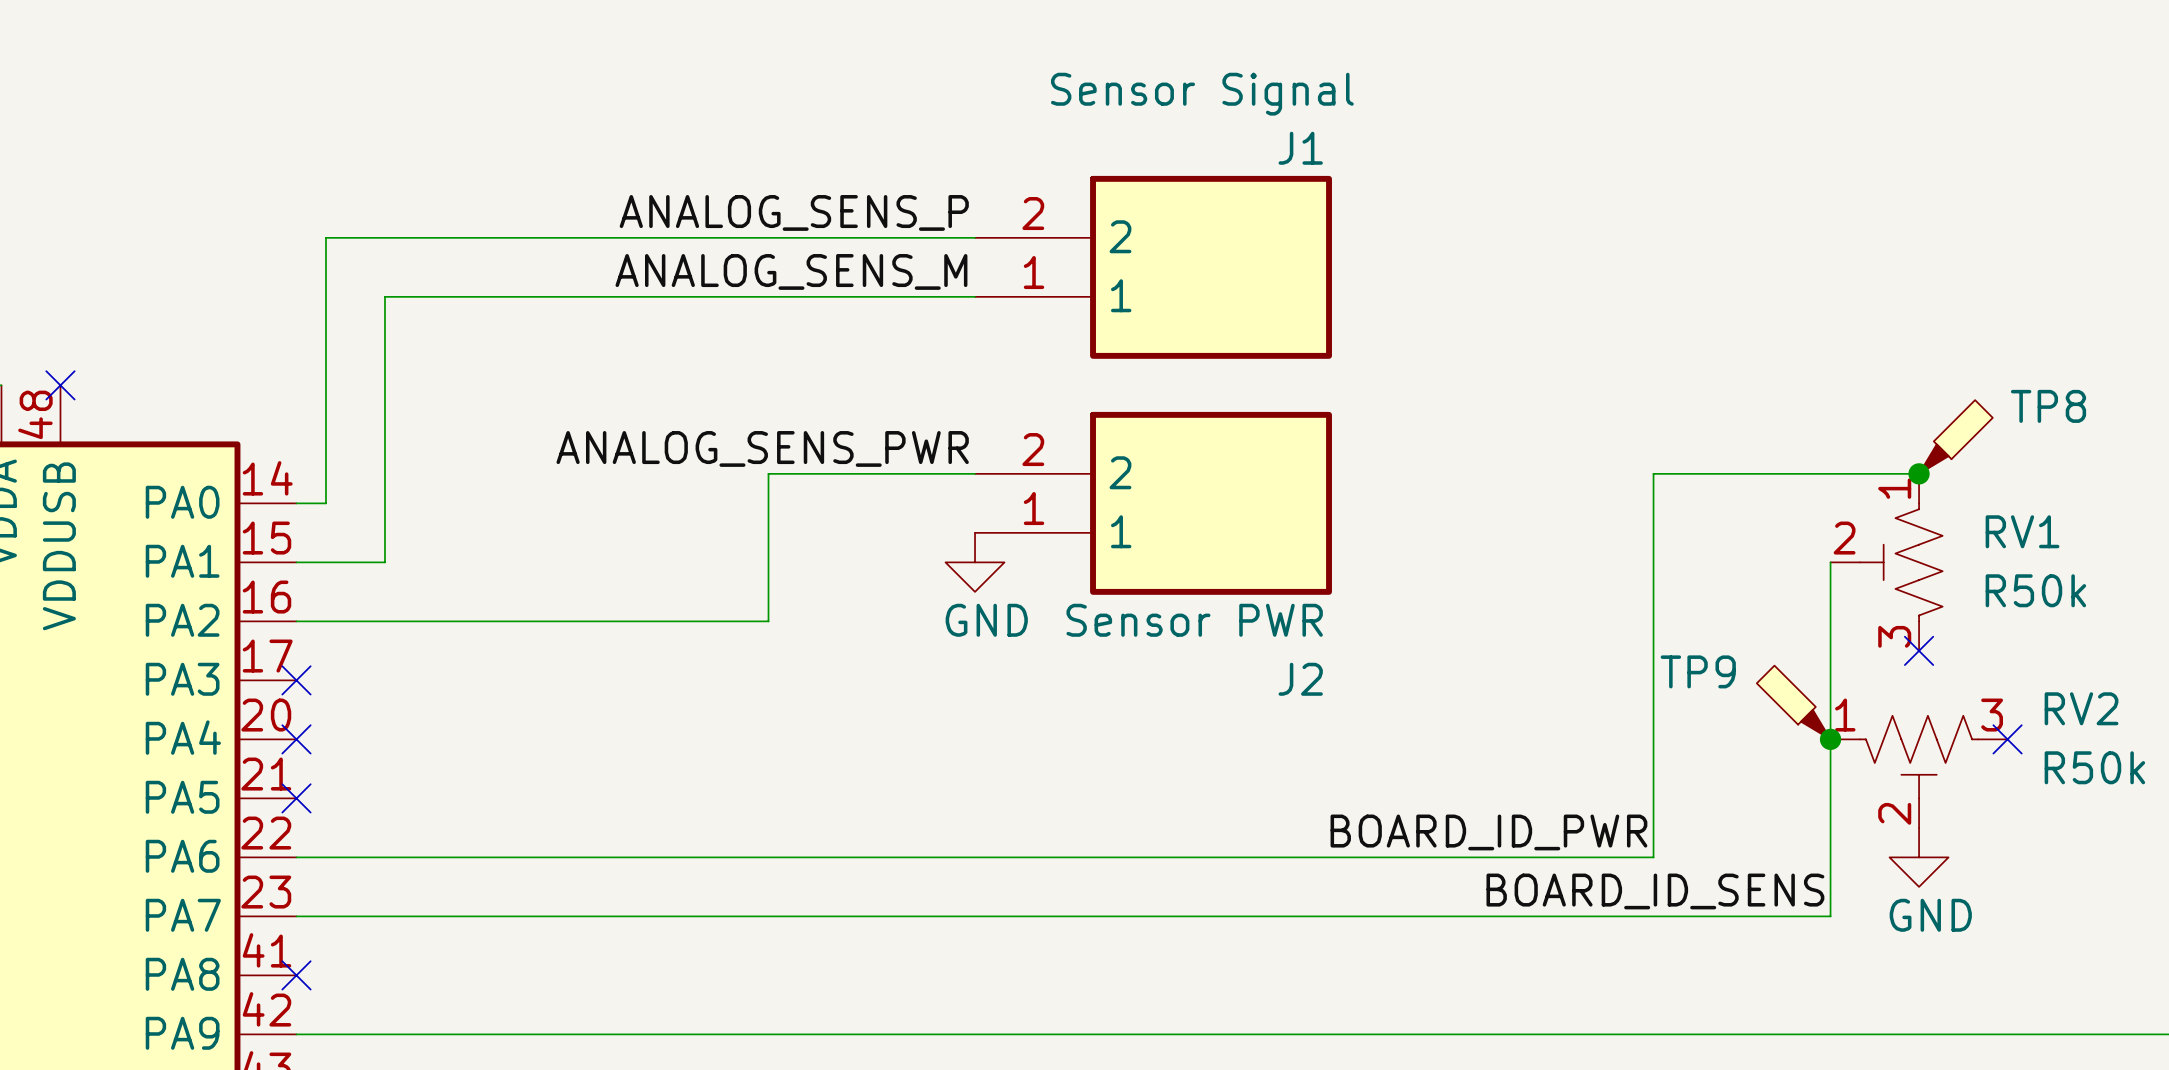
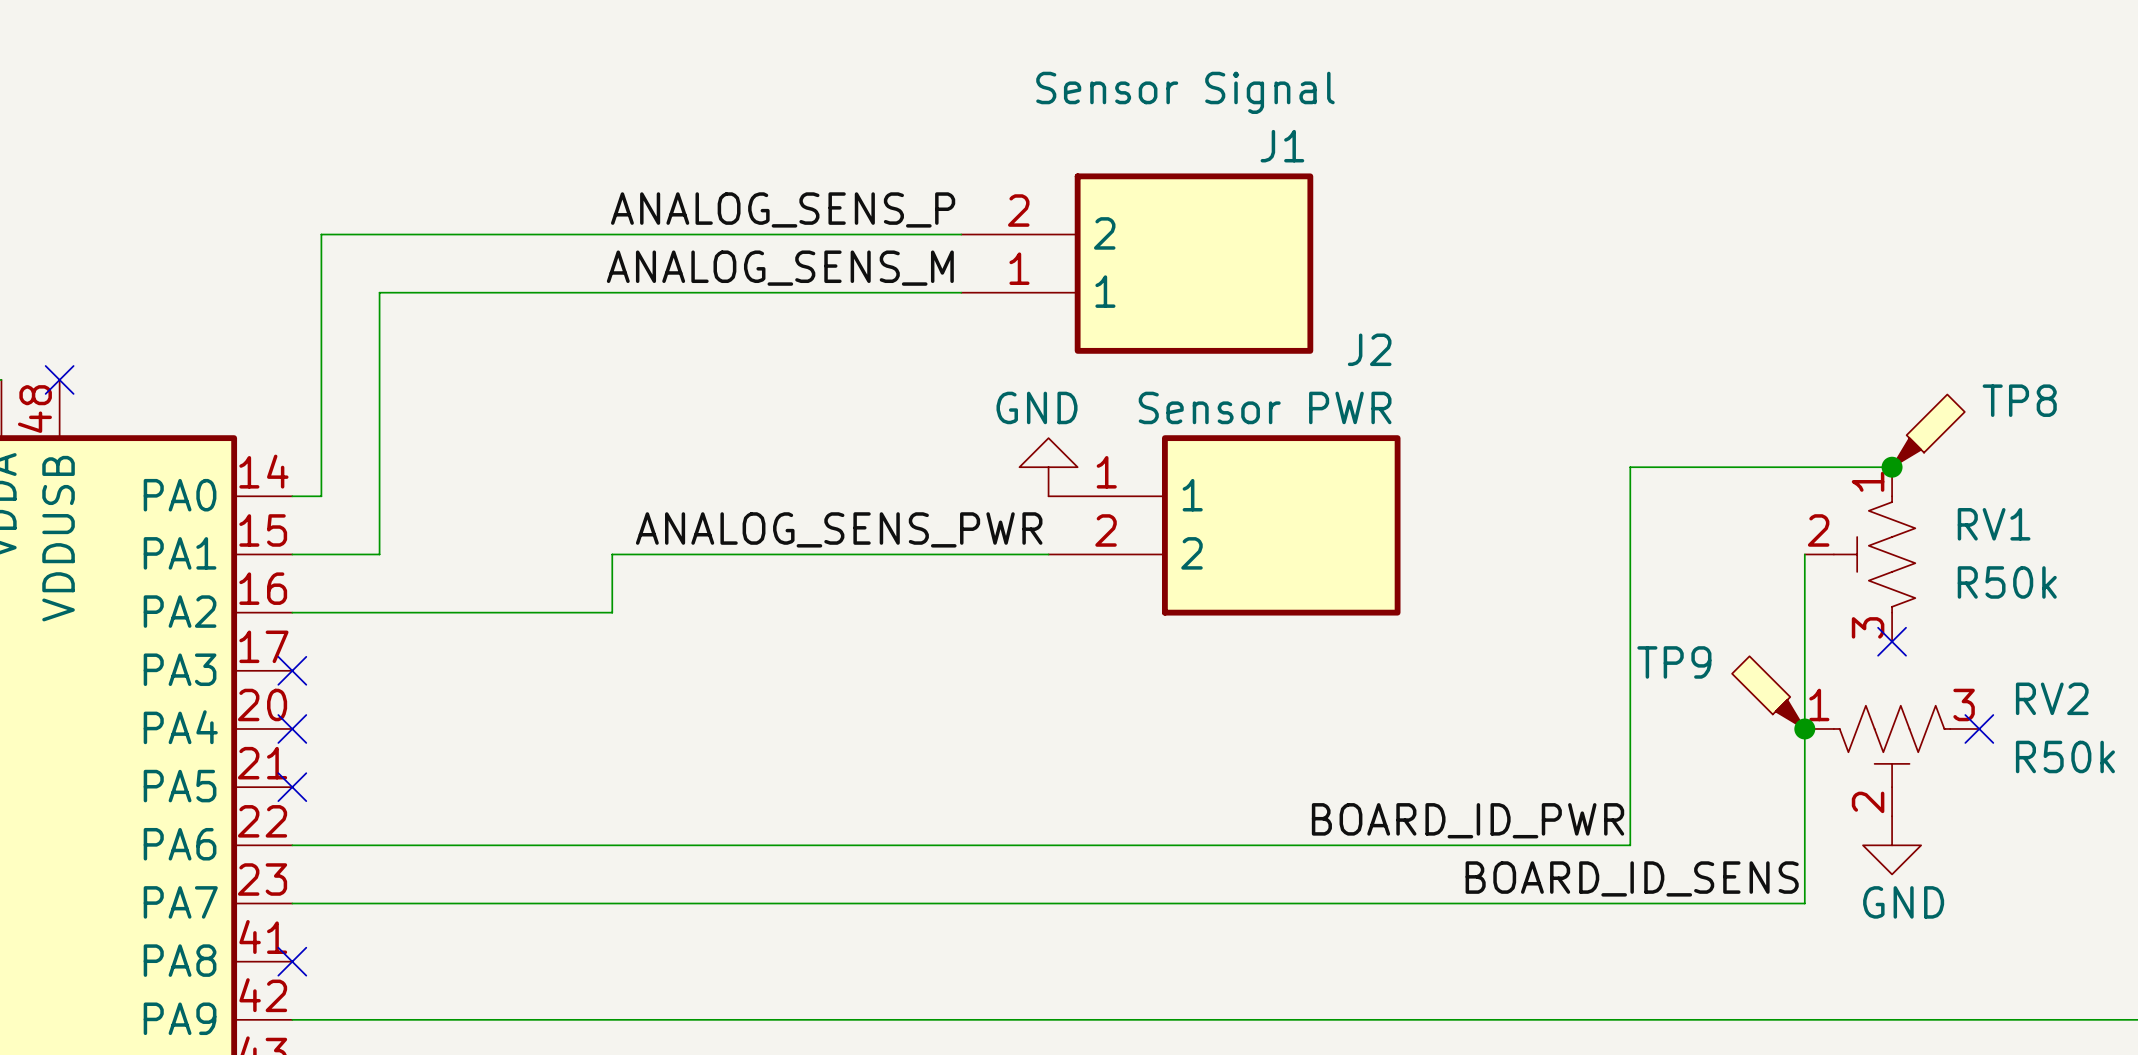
label position: ANALOG_SENS_PWR (762, 448) -> ANALOG_SENS_PWR (839, 529)
wire: (975, 473) (768, 473) (768, 621) (621, 621) -> (1048, 554) (612, 554) (612, 612)
J2 flip: as is (1211, 503) -> up-down (1281, 525)
power symbol rotation: 0° (975, 562) -> 180° (1048, 467)
power symbol position: GND (975, 562) -> GND (1048, 467)

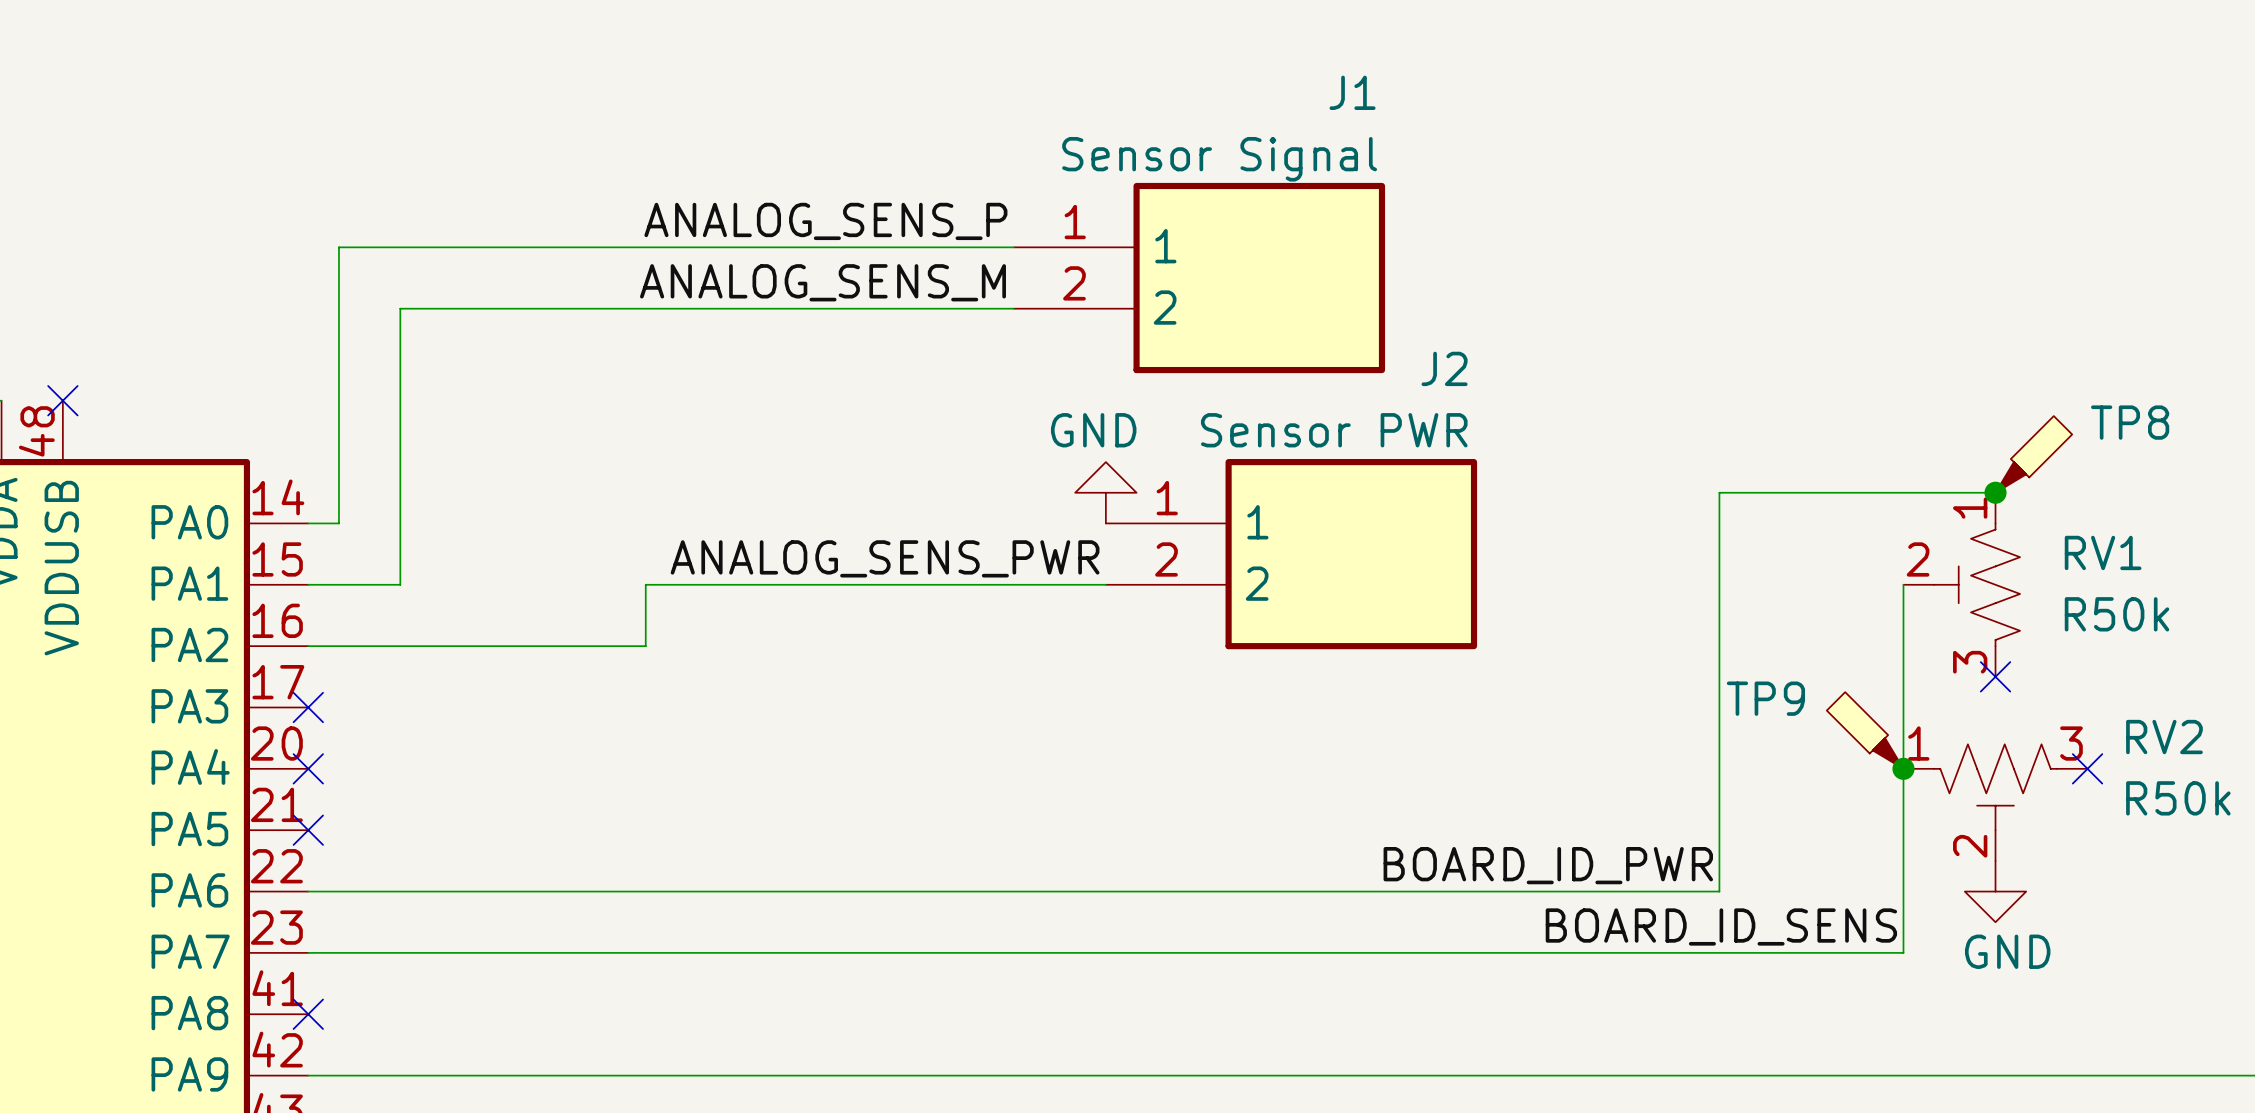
J1 value position: Sensor Signal (1185, 92) -> Sensor Signal (1219, 159)
J1 name position: J1 (1282, 146) -> J1 (1352, 92)
J1 flip: as is (1193, 263) -> up-down (1259, 278)

